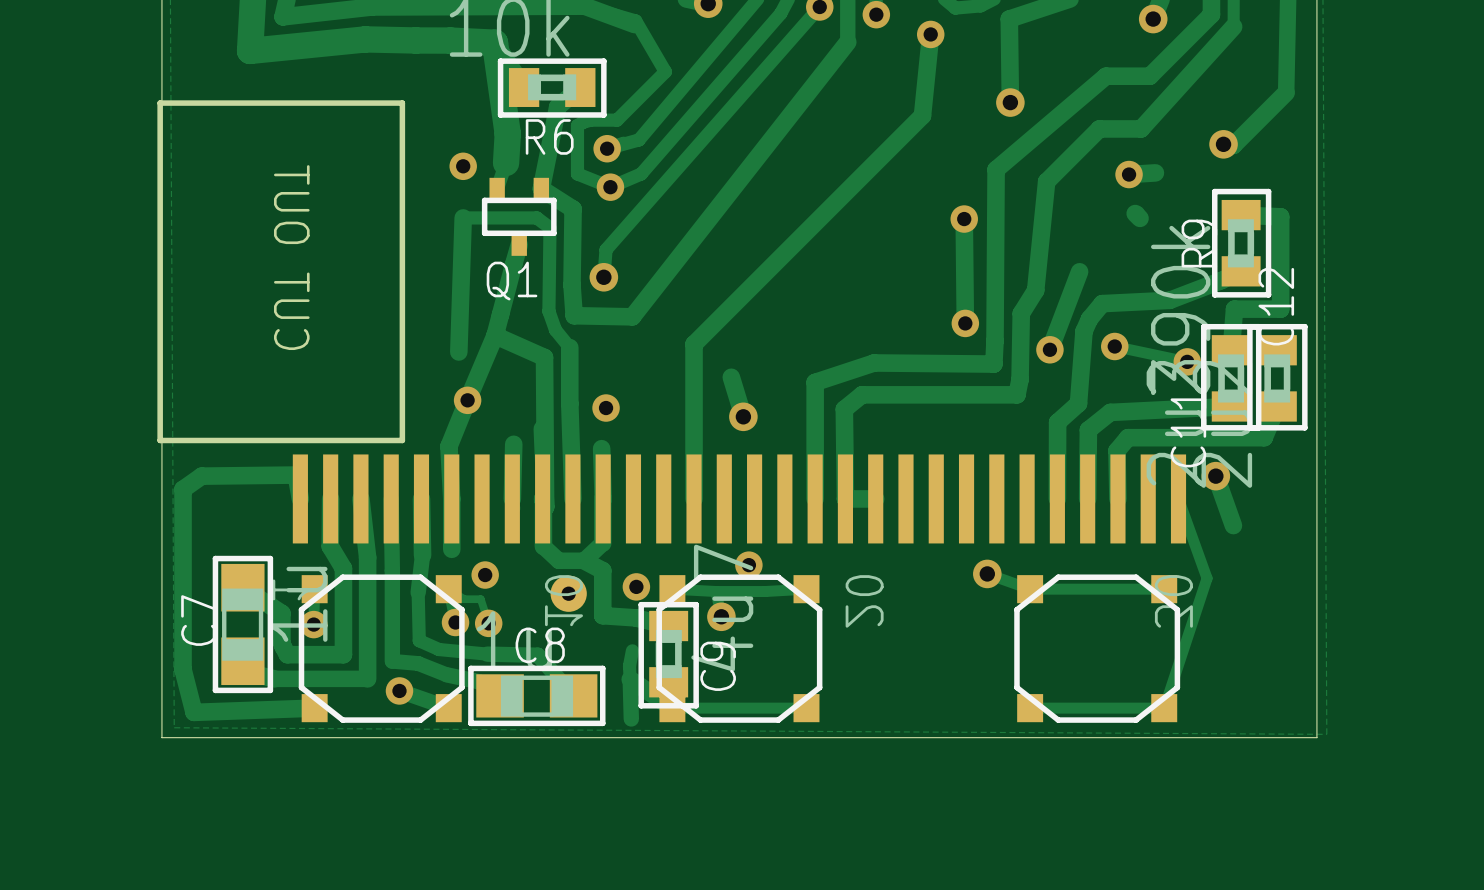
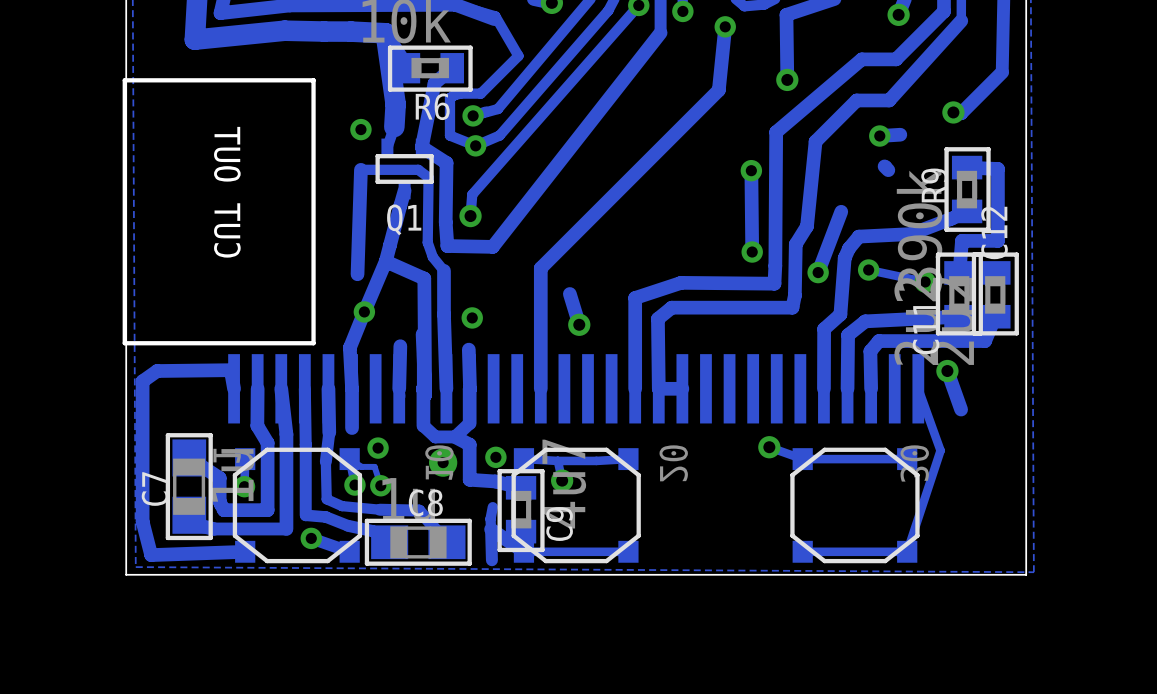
via: (748, 565) -> none

